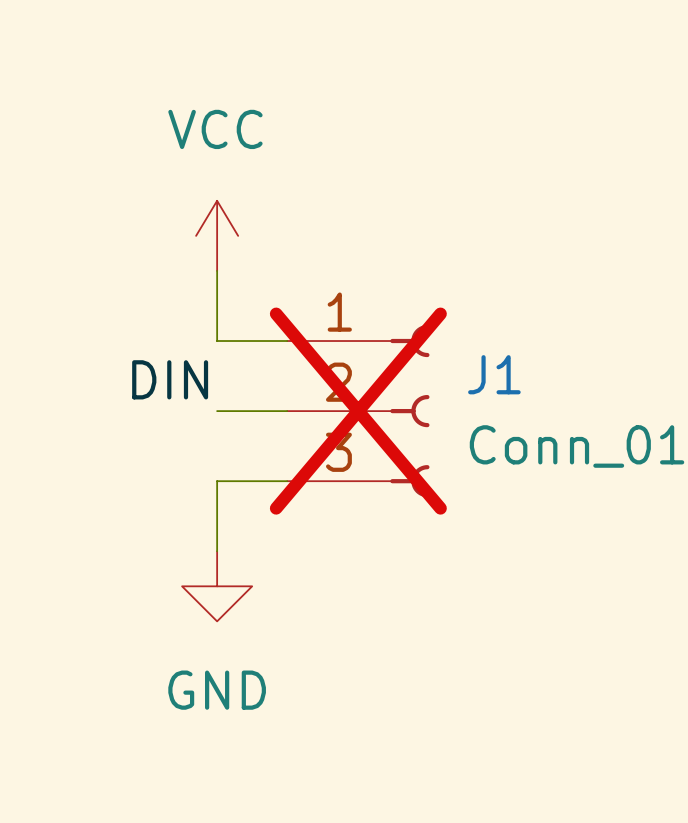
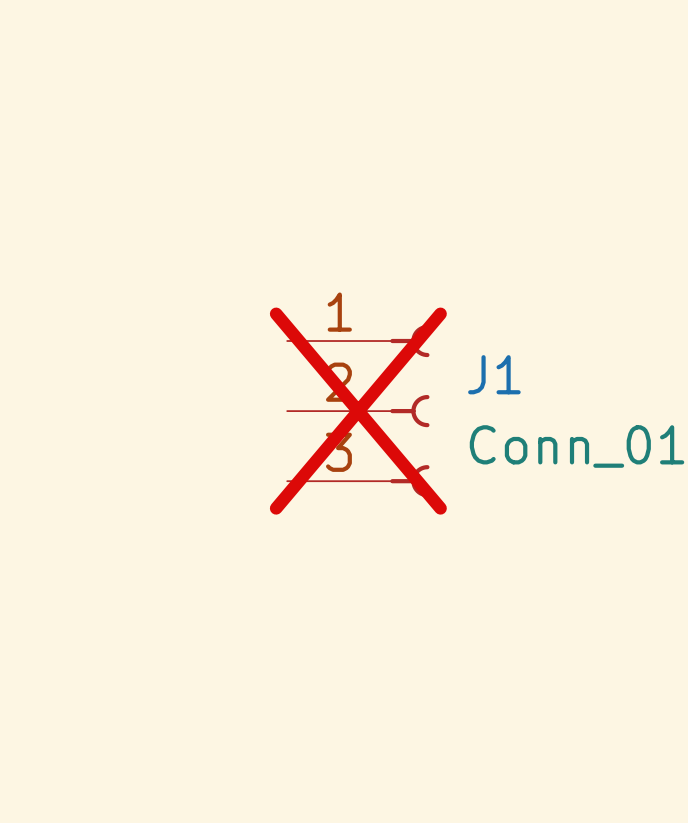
power symbol: VCC (217, 235) -> none
wire: (217, 270) (217, 341) (287, 341) -> none
label: DIN (170, 379) -> none
wire: (217, 411) (287, 411) -> none
wire: (287, 481) (217, 481) (217, 551) -> none
power symbol: GND (217, 586) -> none

